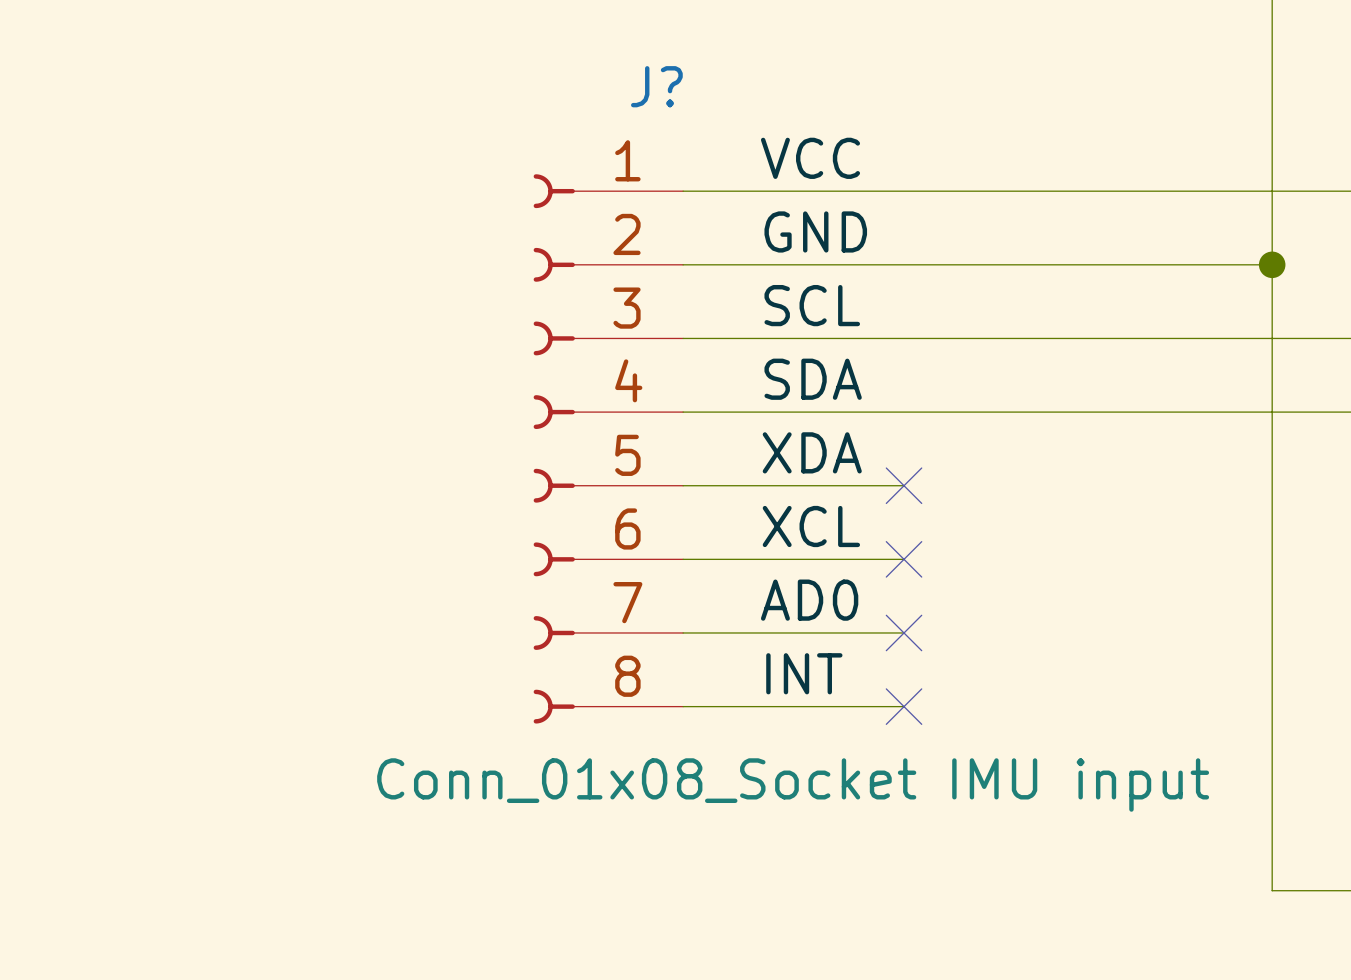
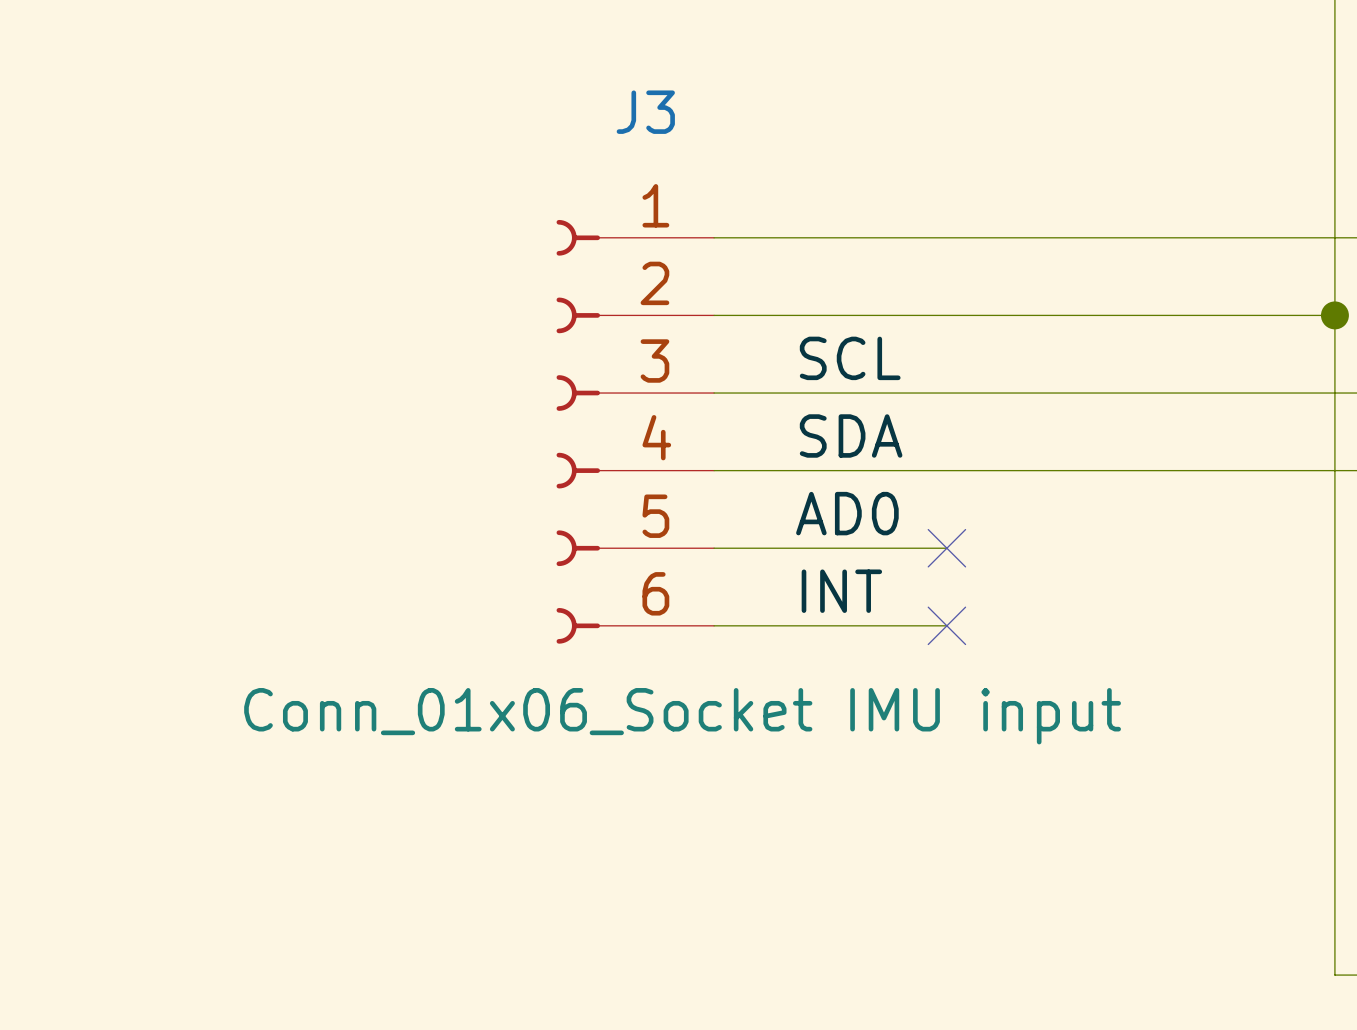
label: VCC (810, 158) -> none
label: GND (815, 231) -> none
J3: none -> Conn_01x06_Socket IMU input (635, 431)
J?: Conn_01x08_Socket IMU input (608, 448) -> none
label: XDA (812, 452) -> AD0 (847, 513)
label: XCL (811, 526) -> INT (841, 591)
label: AD0 (809, 600) -> none
wire: (683, 632) (904, 632) -> none
no-connect mark: (904, 632) -> none
label: INT (804, 673) -> none
wire: (683, 706) (904, 706) -> none
no-connect mark: (904, 706) -> none

